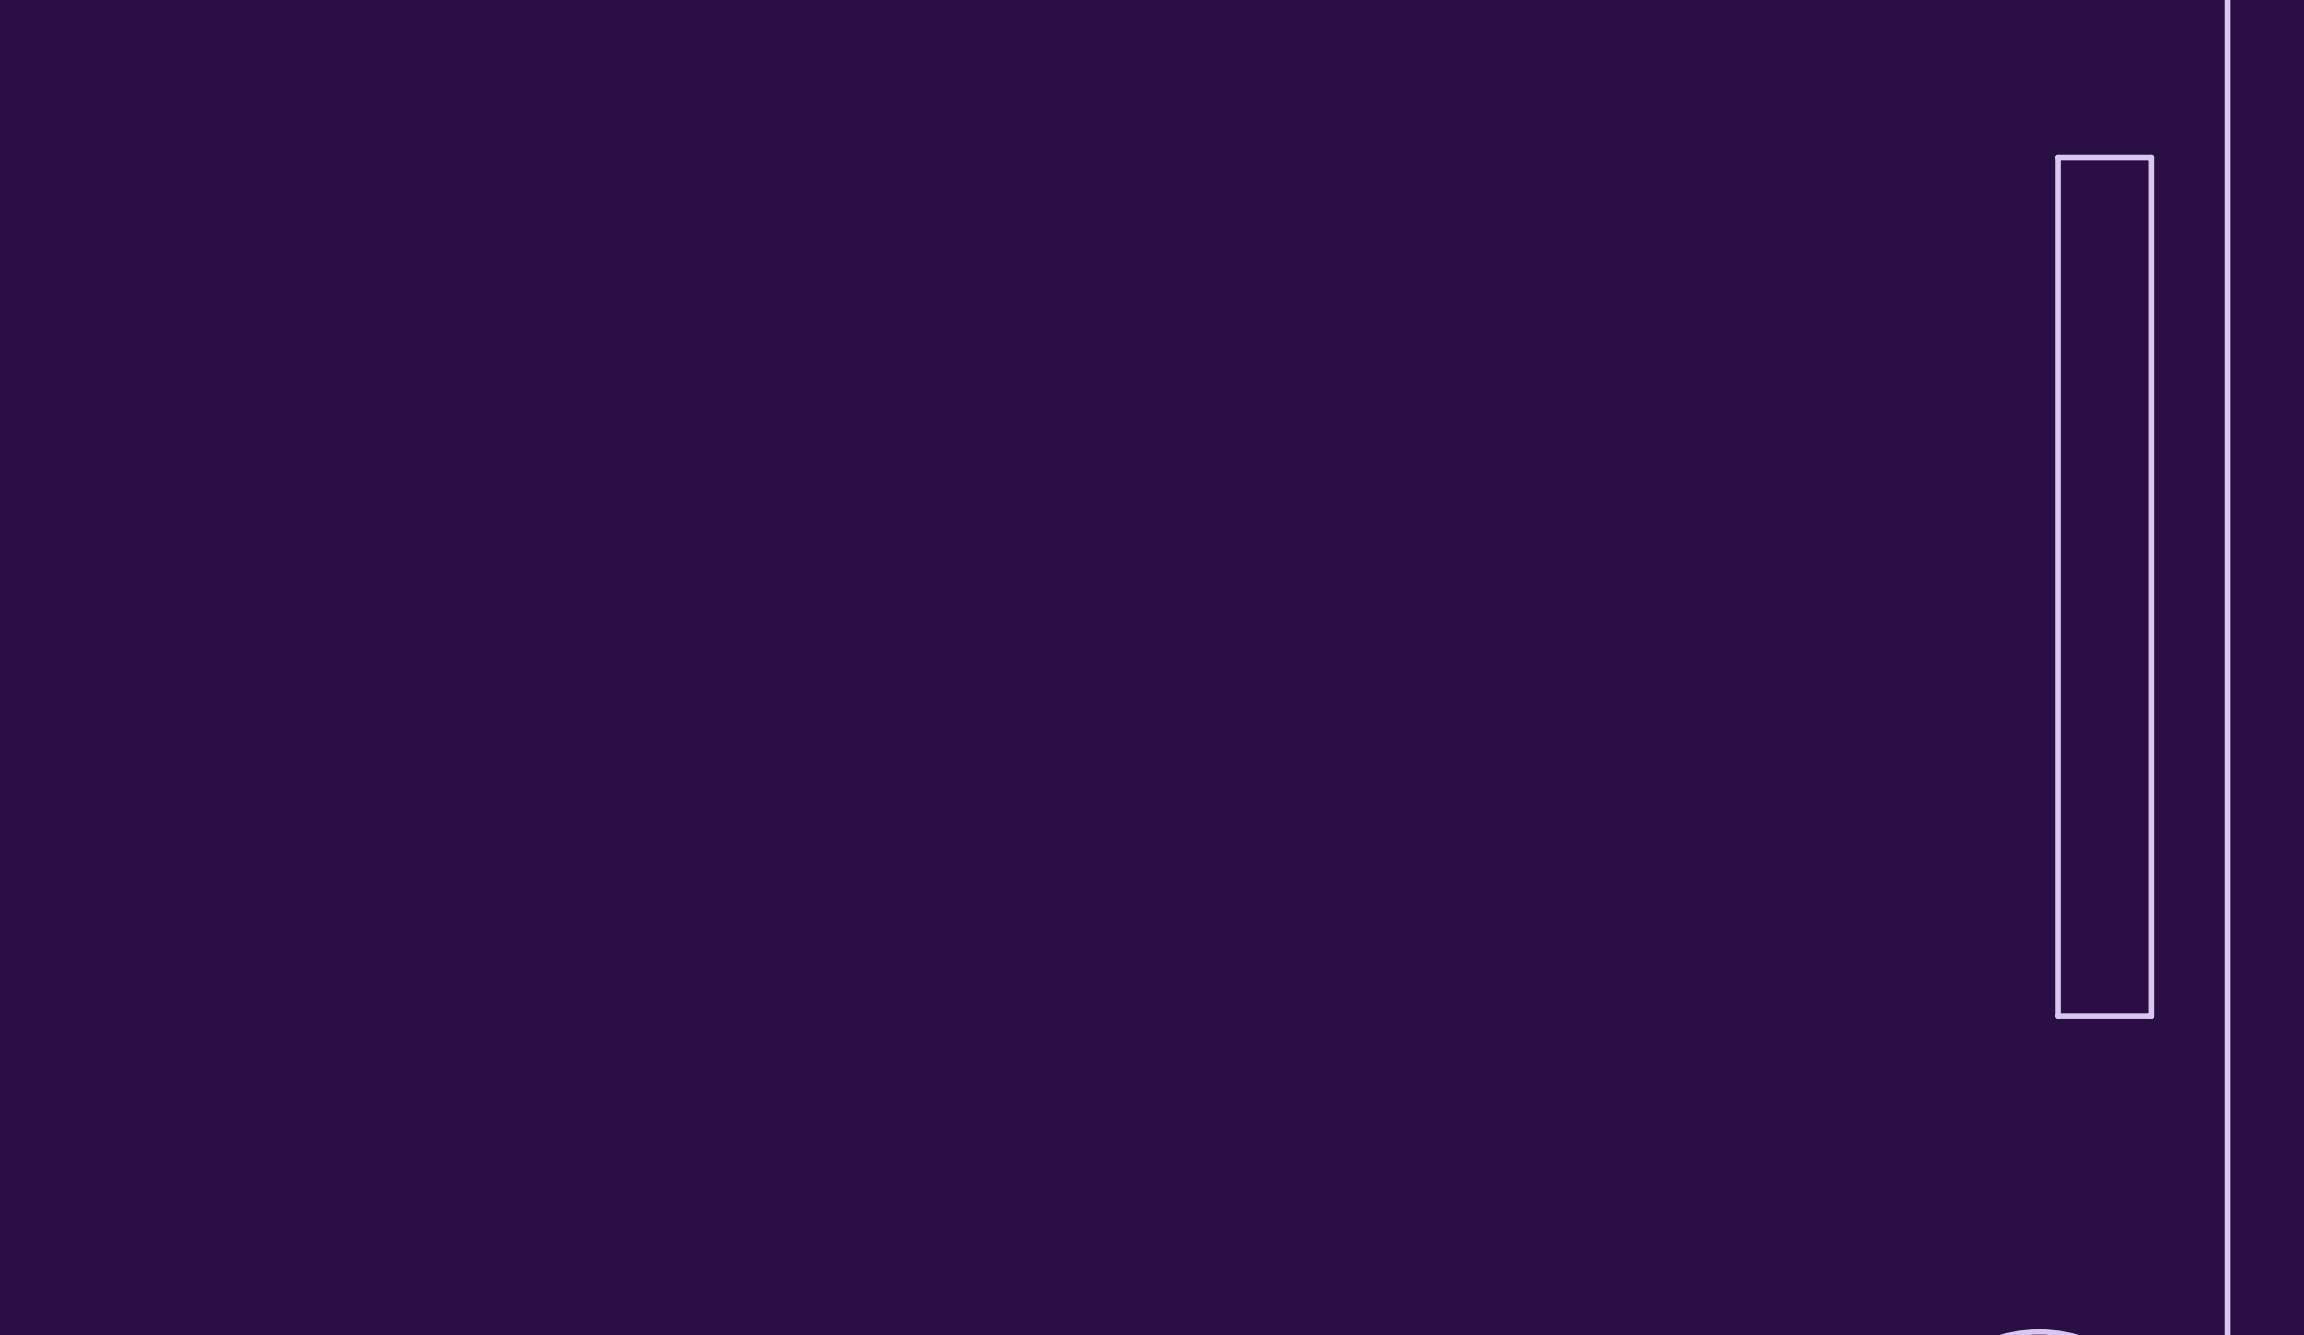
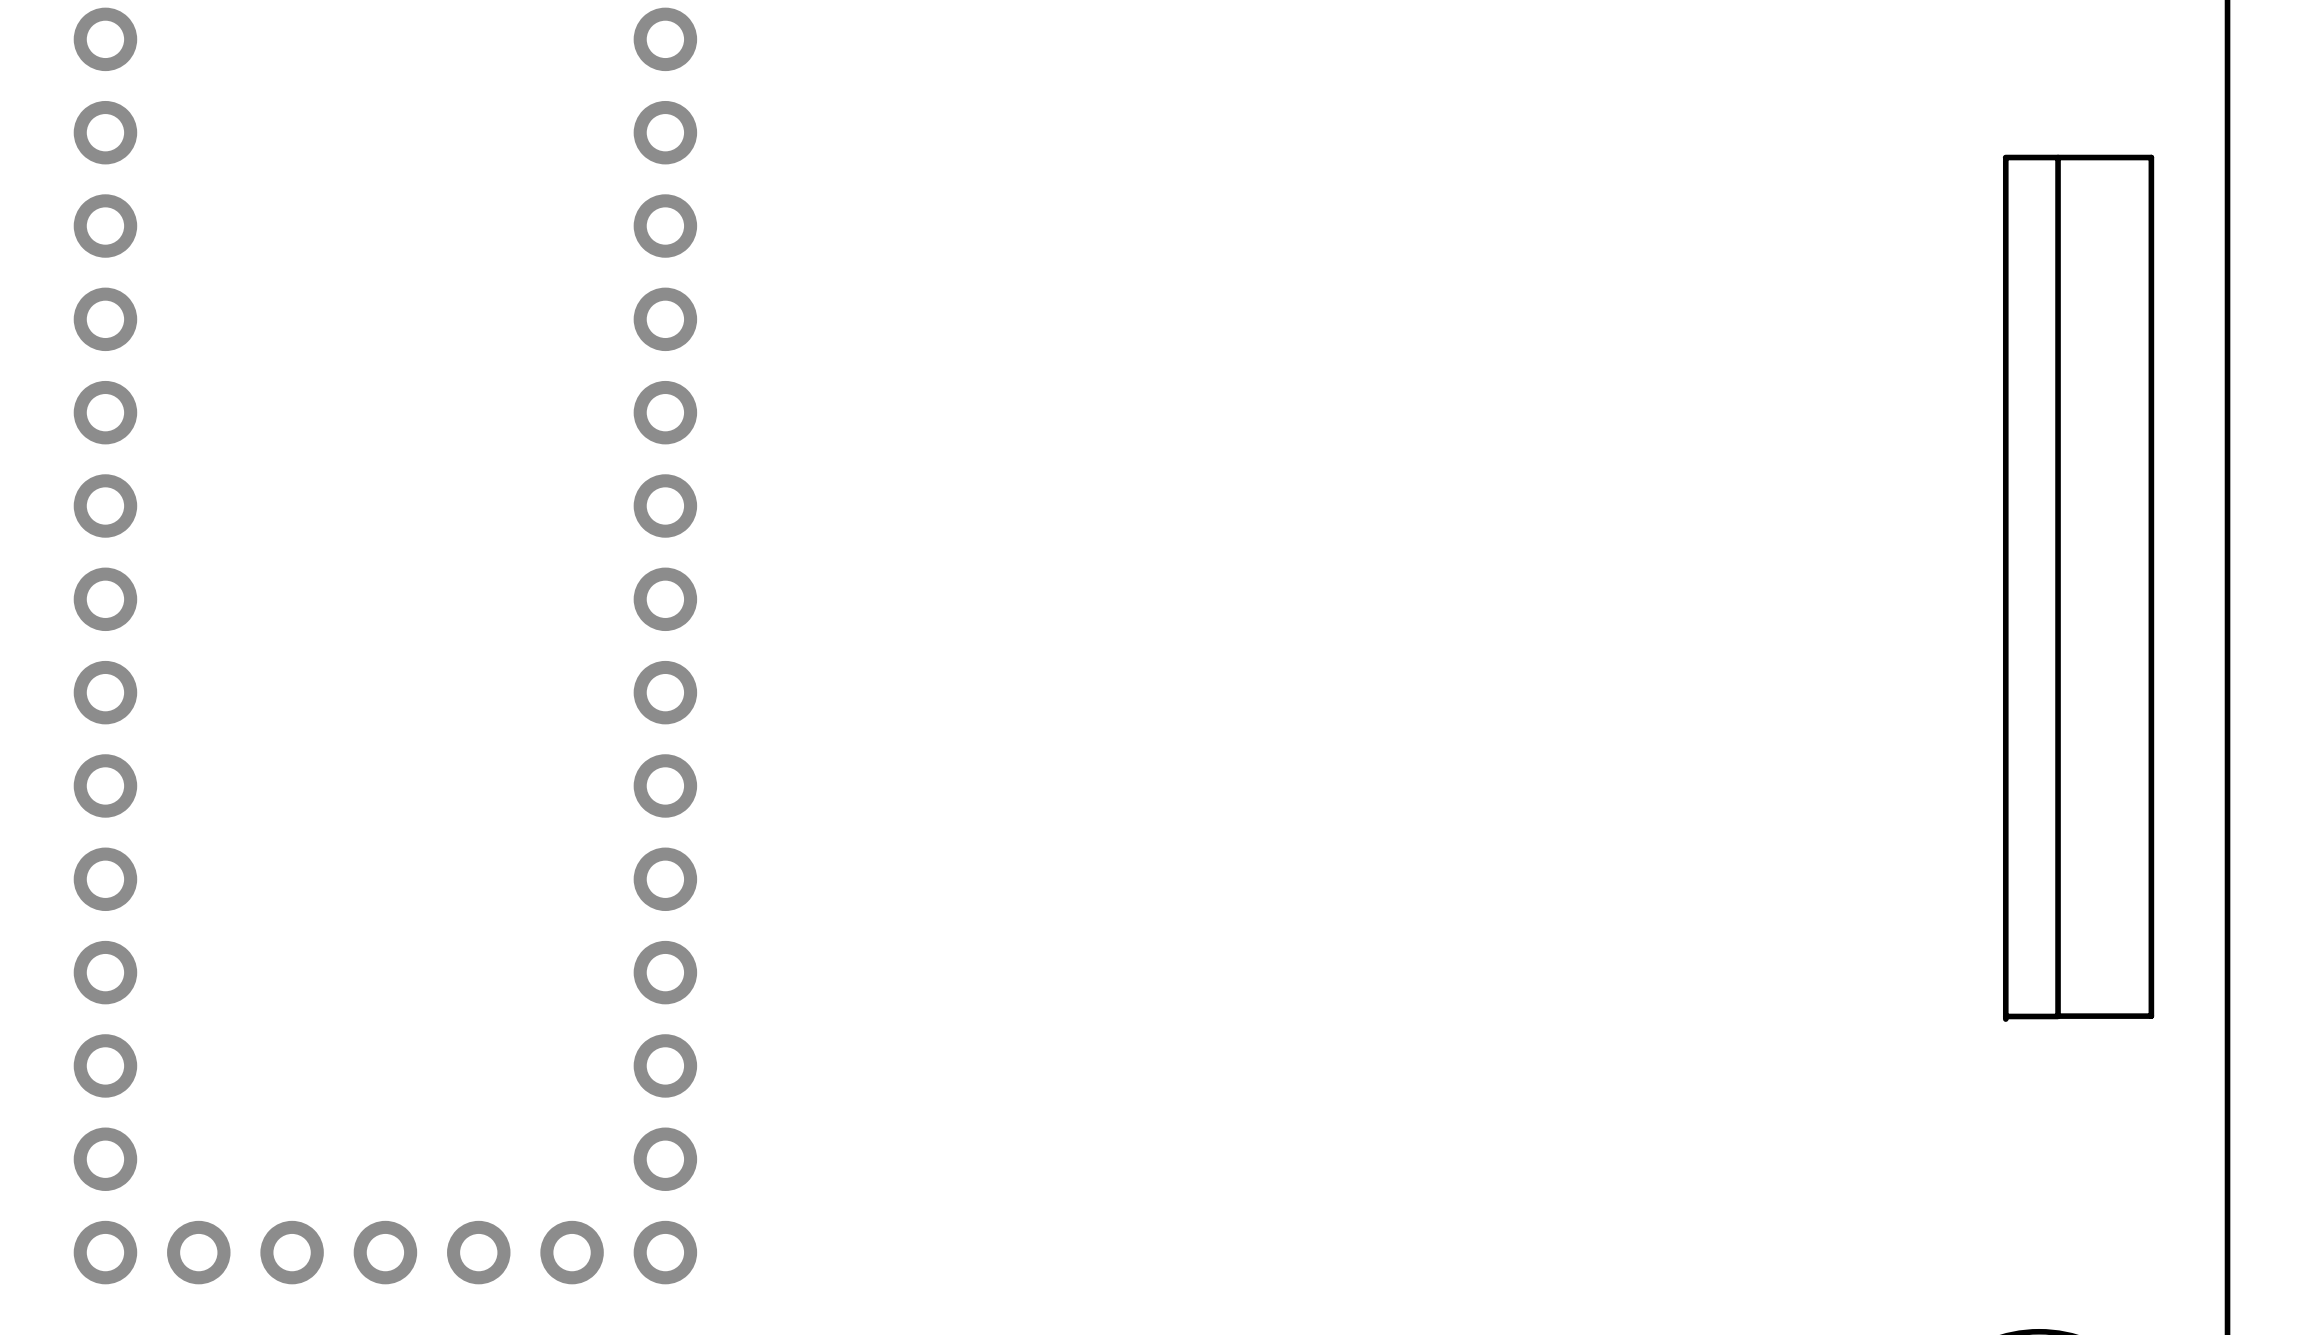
board edge: (2151, 157) (2058, 157) -> (2151, 157) (2005, 157)
board edge: none -> (2005, 160) (2005, 1019)
part: none -> (385, 645)
board edge: none -> (2057, 1016) (2005, 1016)

